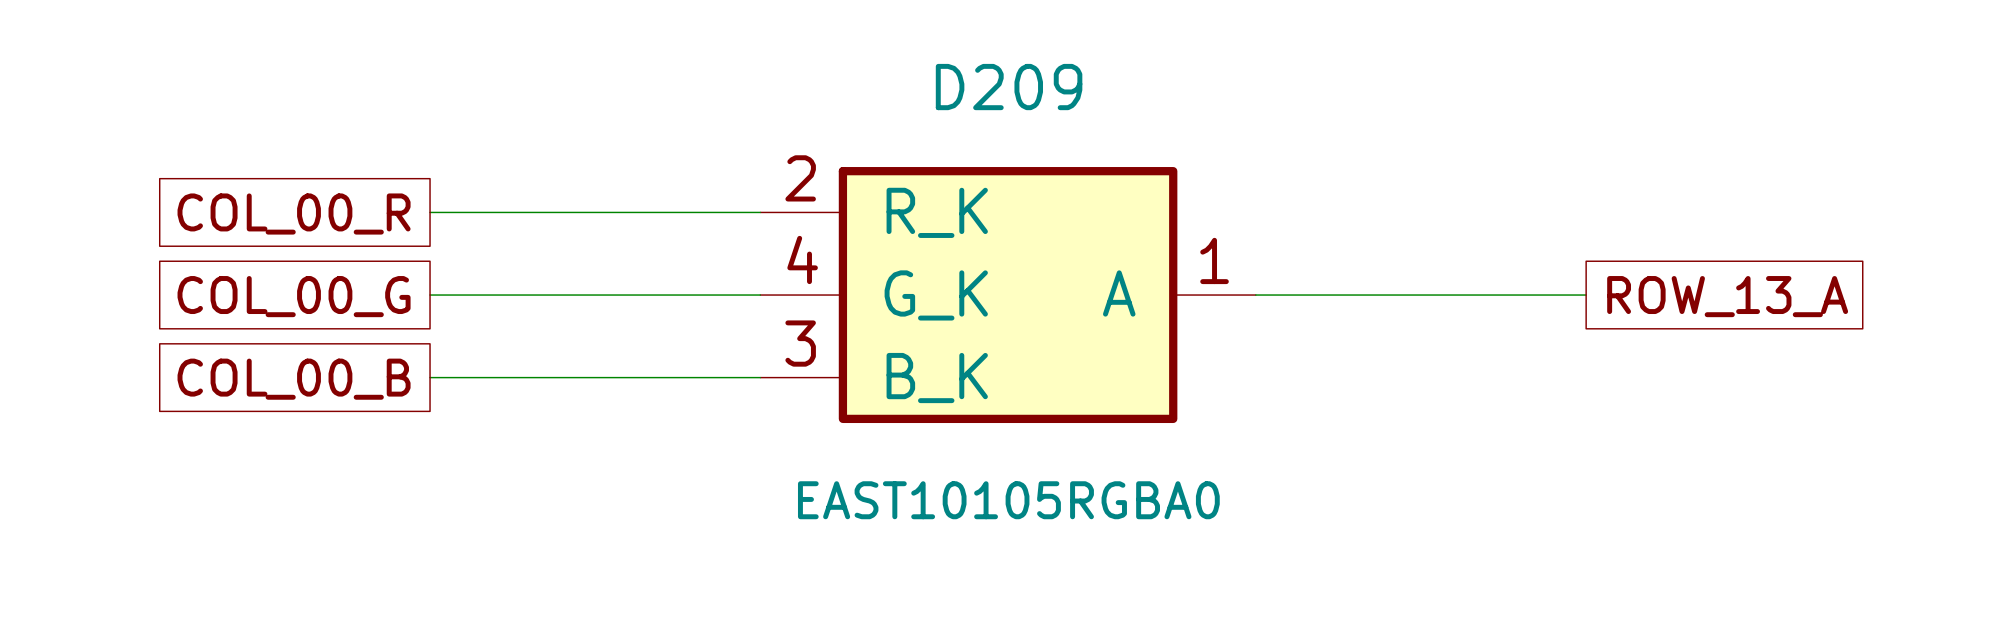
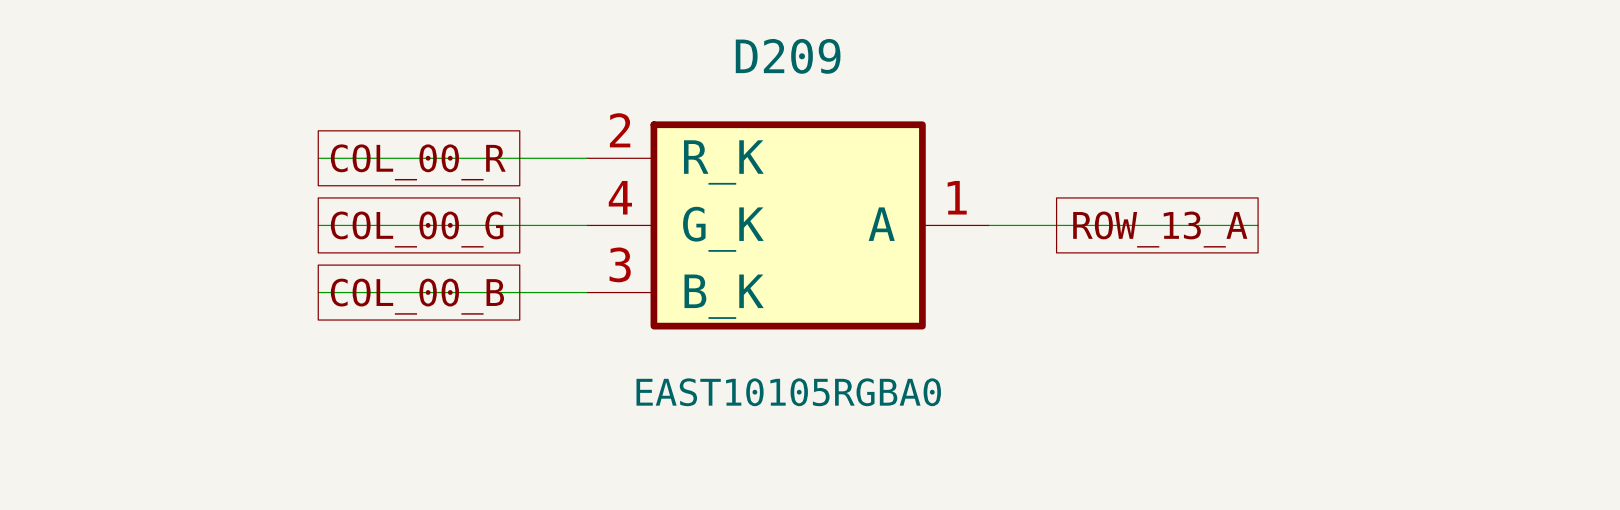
global label rotation: 0° (294, 214) -> 180° (418, 162)
global label position: COL_00_R (294, 214) -> COL_00_R (418, 162)
global label rotation: 0° (294, 296) -> 180° (417, 229)
global label rotation: 0° (1727, 296) -> 180° (1160, 229)
global label rotation: 0° (294, 379) -> 180° (417, 296)

